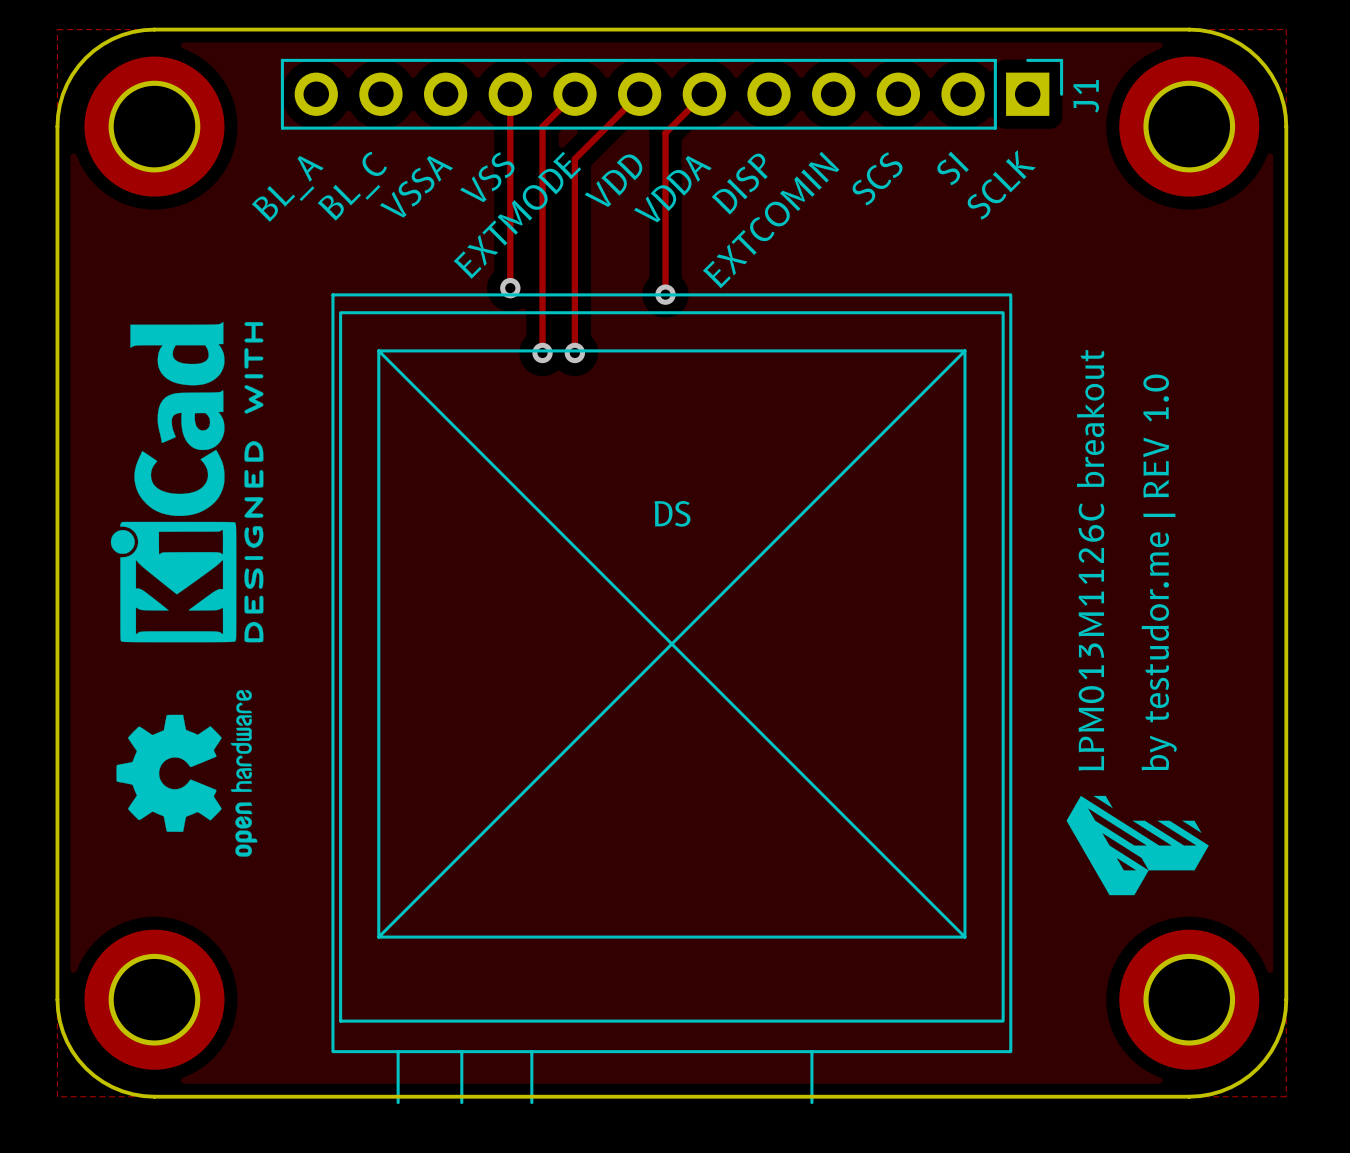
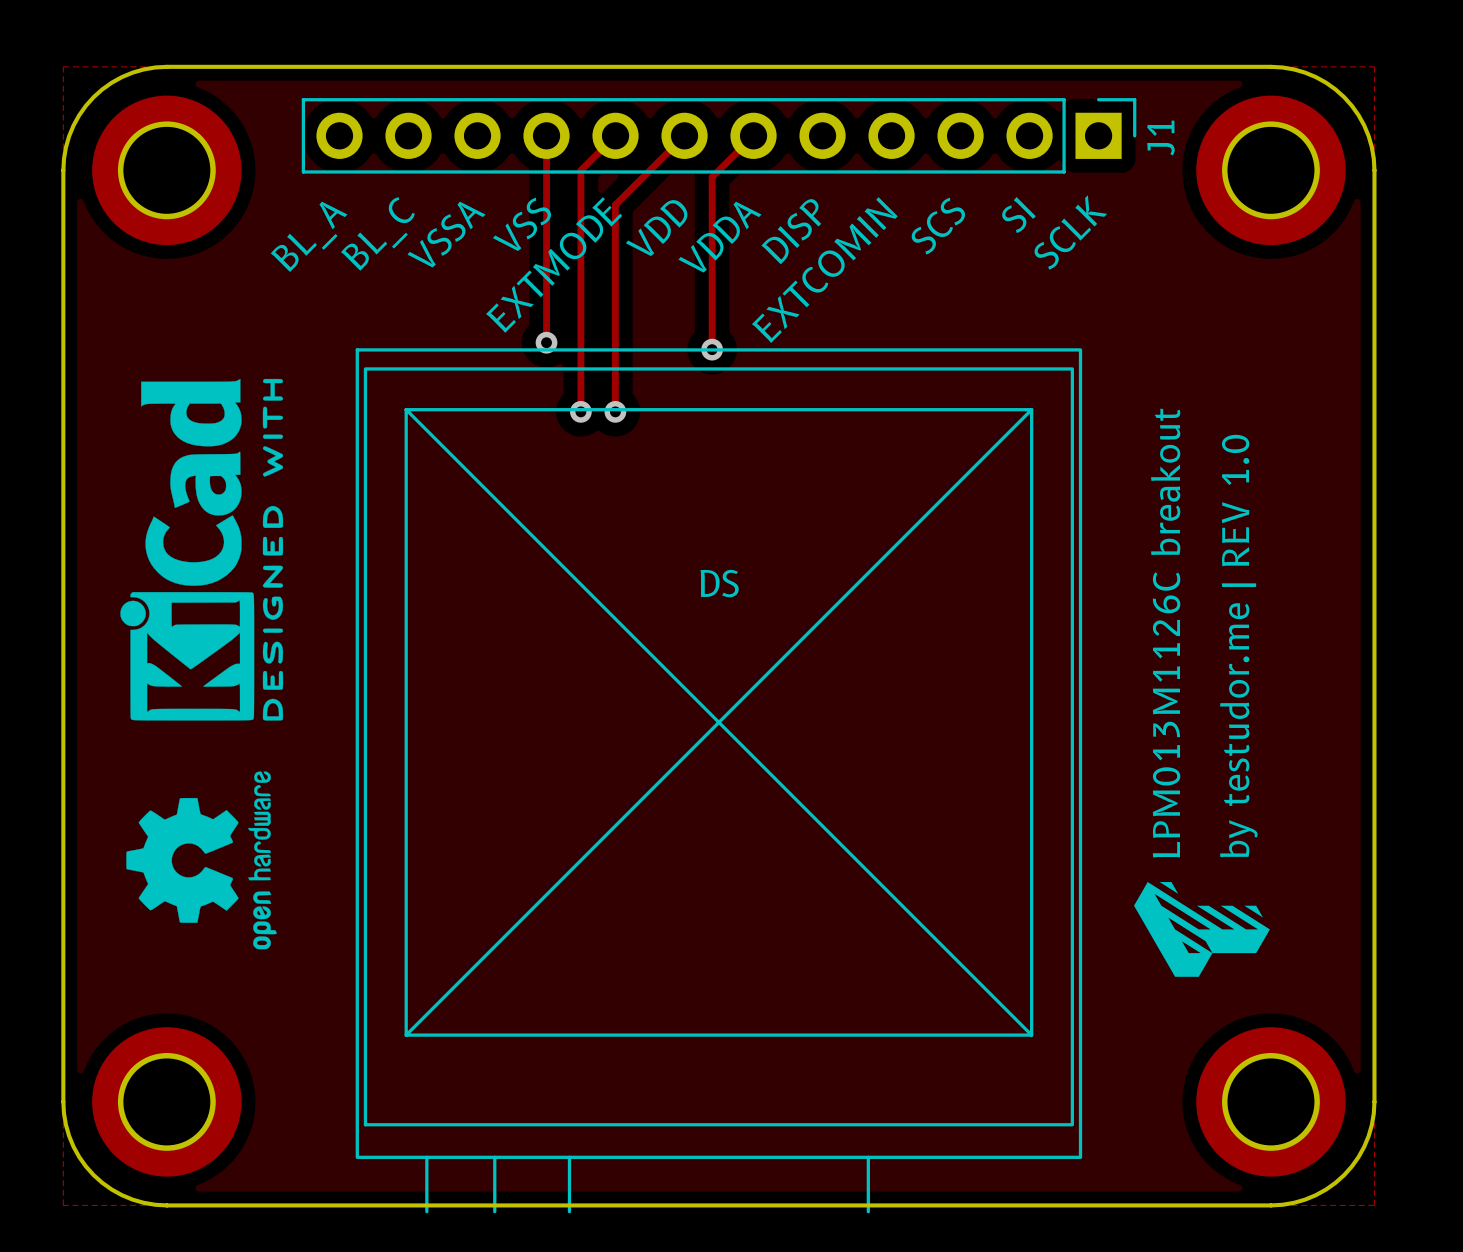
drawing shape: [1066, 795, 1209, 896] -> [1134, 882, 1270, 977]
drawing: [1093, 795, 1113, 809] -> none
drawing: [1182, 820, 1202, 834] -> none

